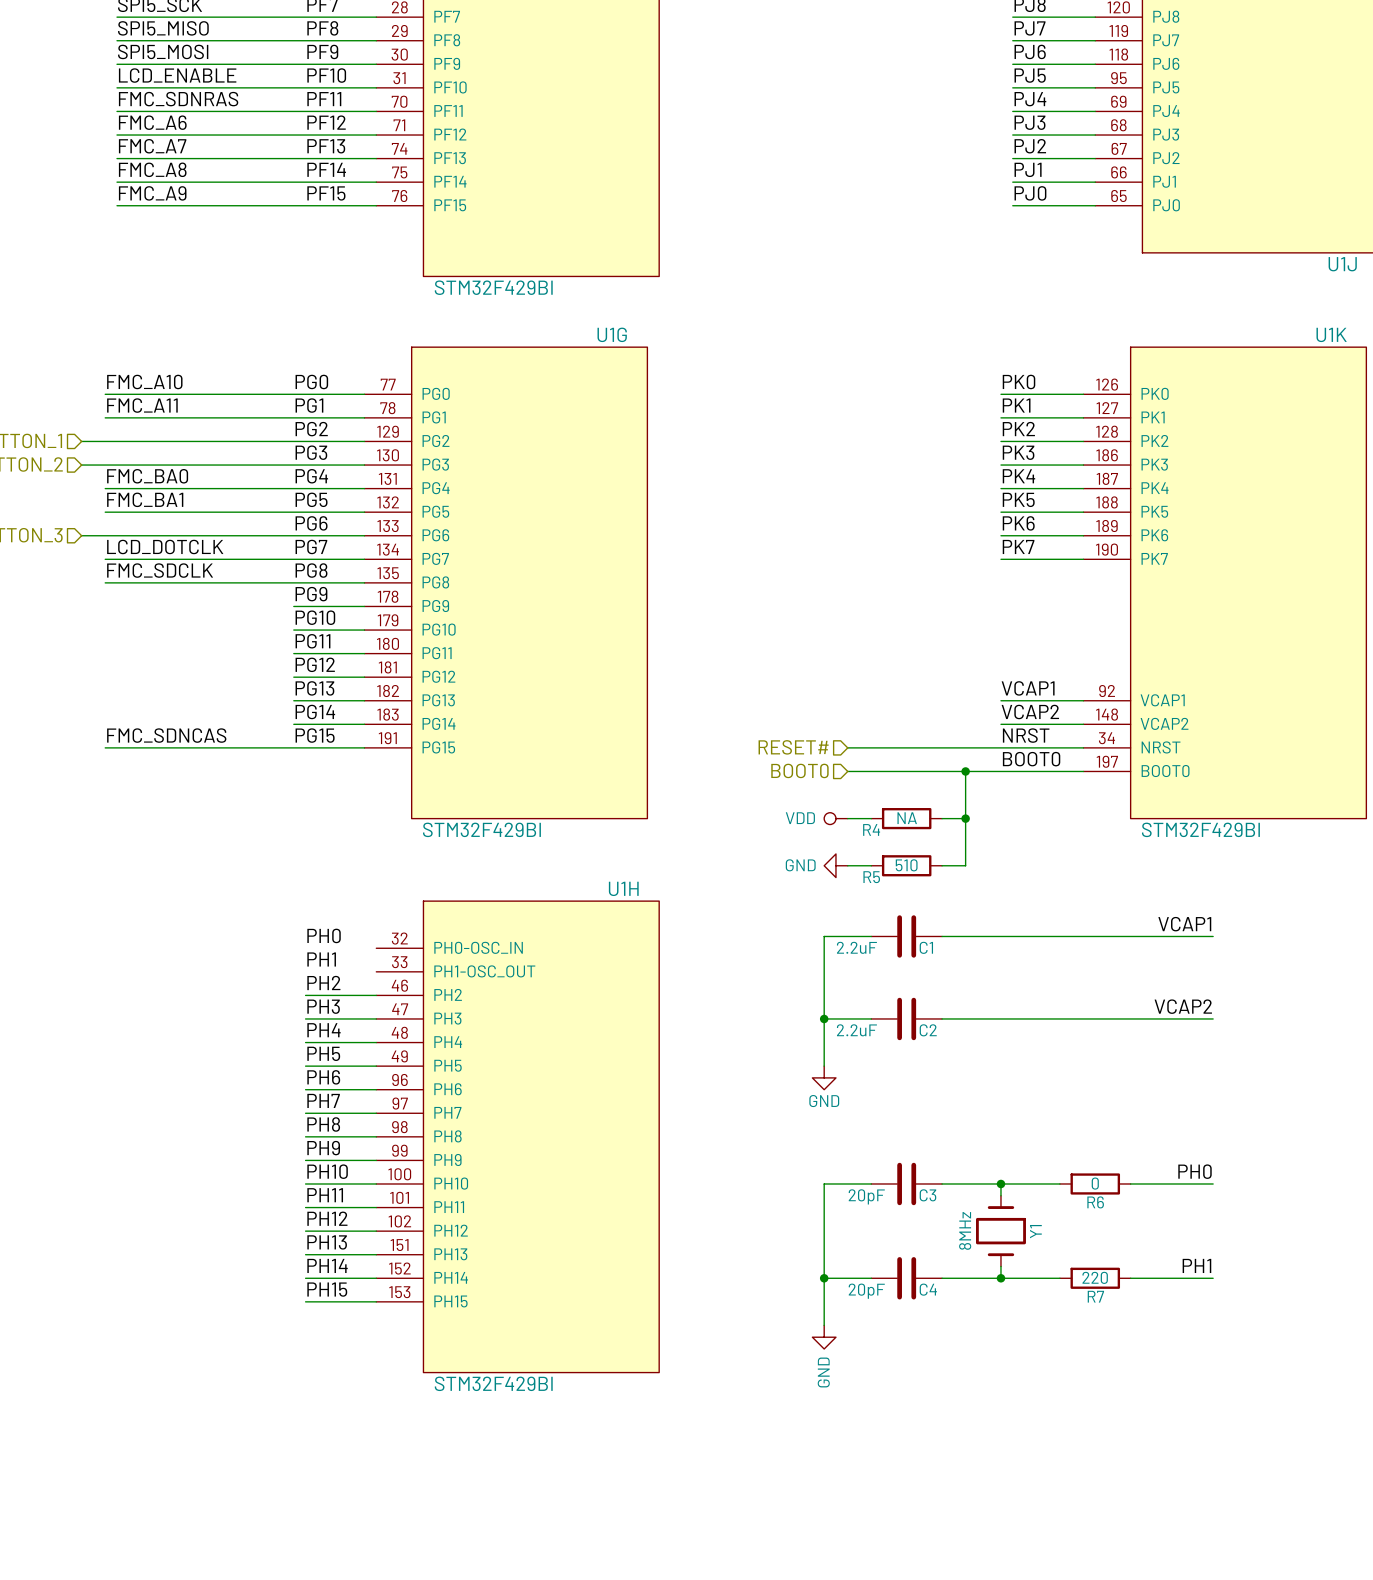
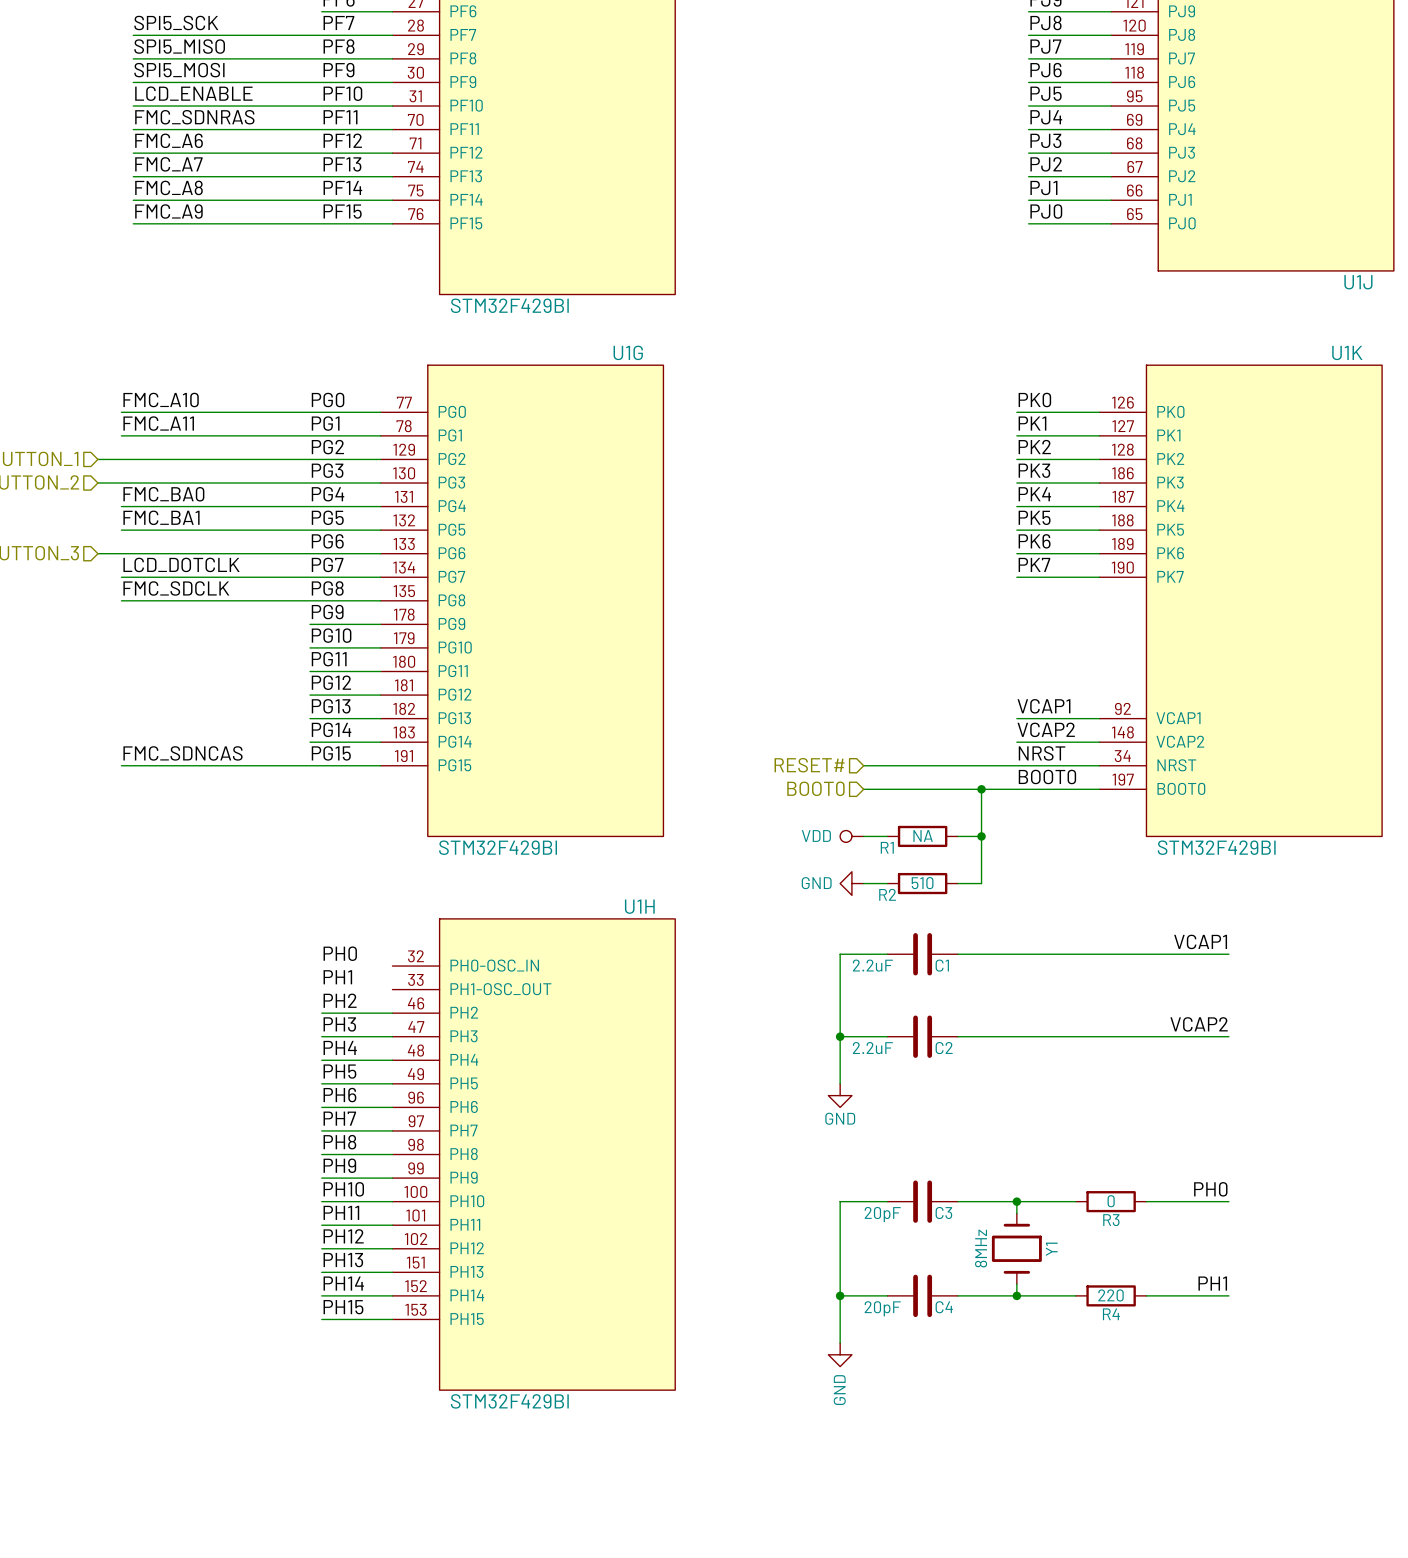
R4 name: R4 (871, 829) -> R1 (887, 847)
R5 name: R5 (871, 877) -> R2 (887, 894)
R6 name: R6 (1095, 1202) -> R3 (1111, 1220)
R7 name: R7 (1095, 1296) -> R4 (1111, 1314)

